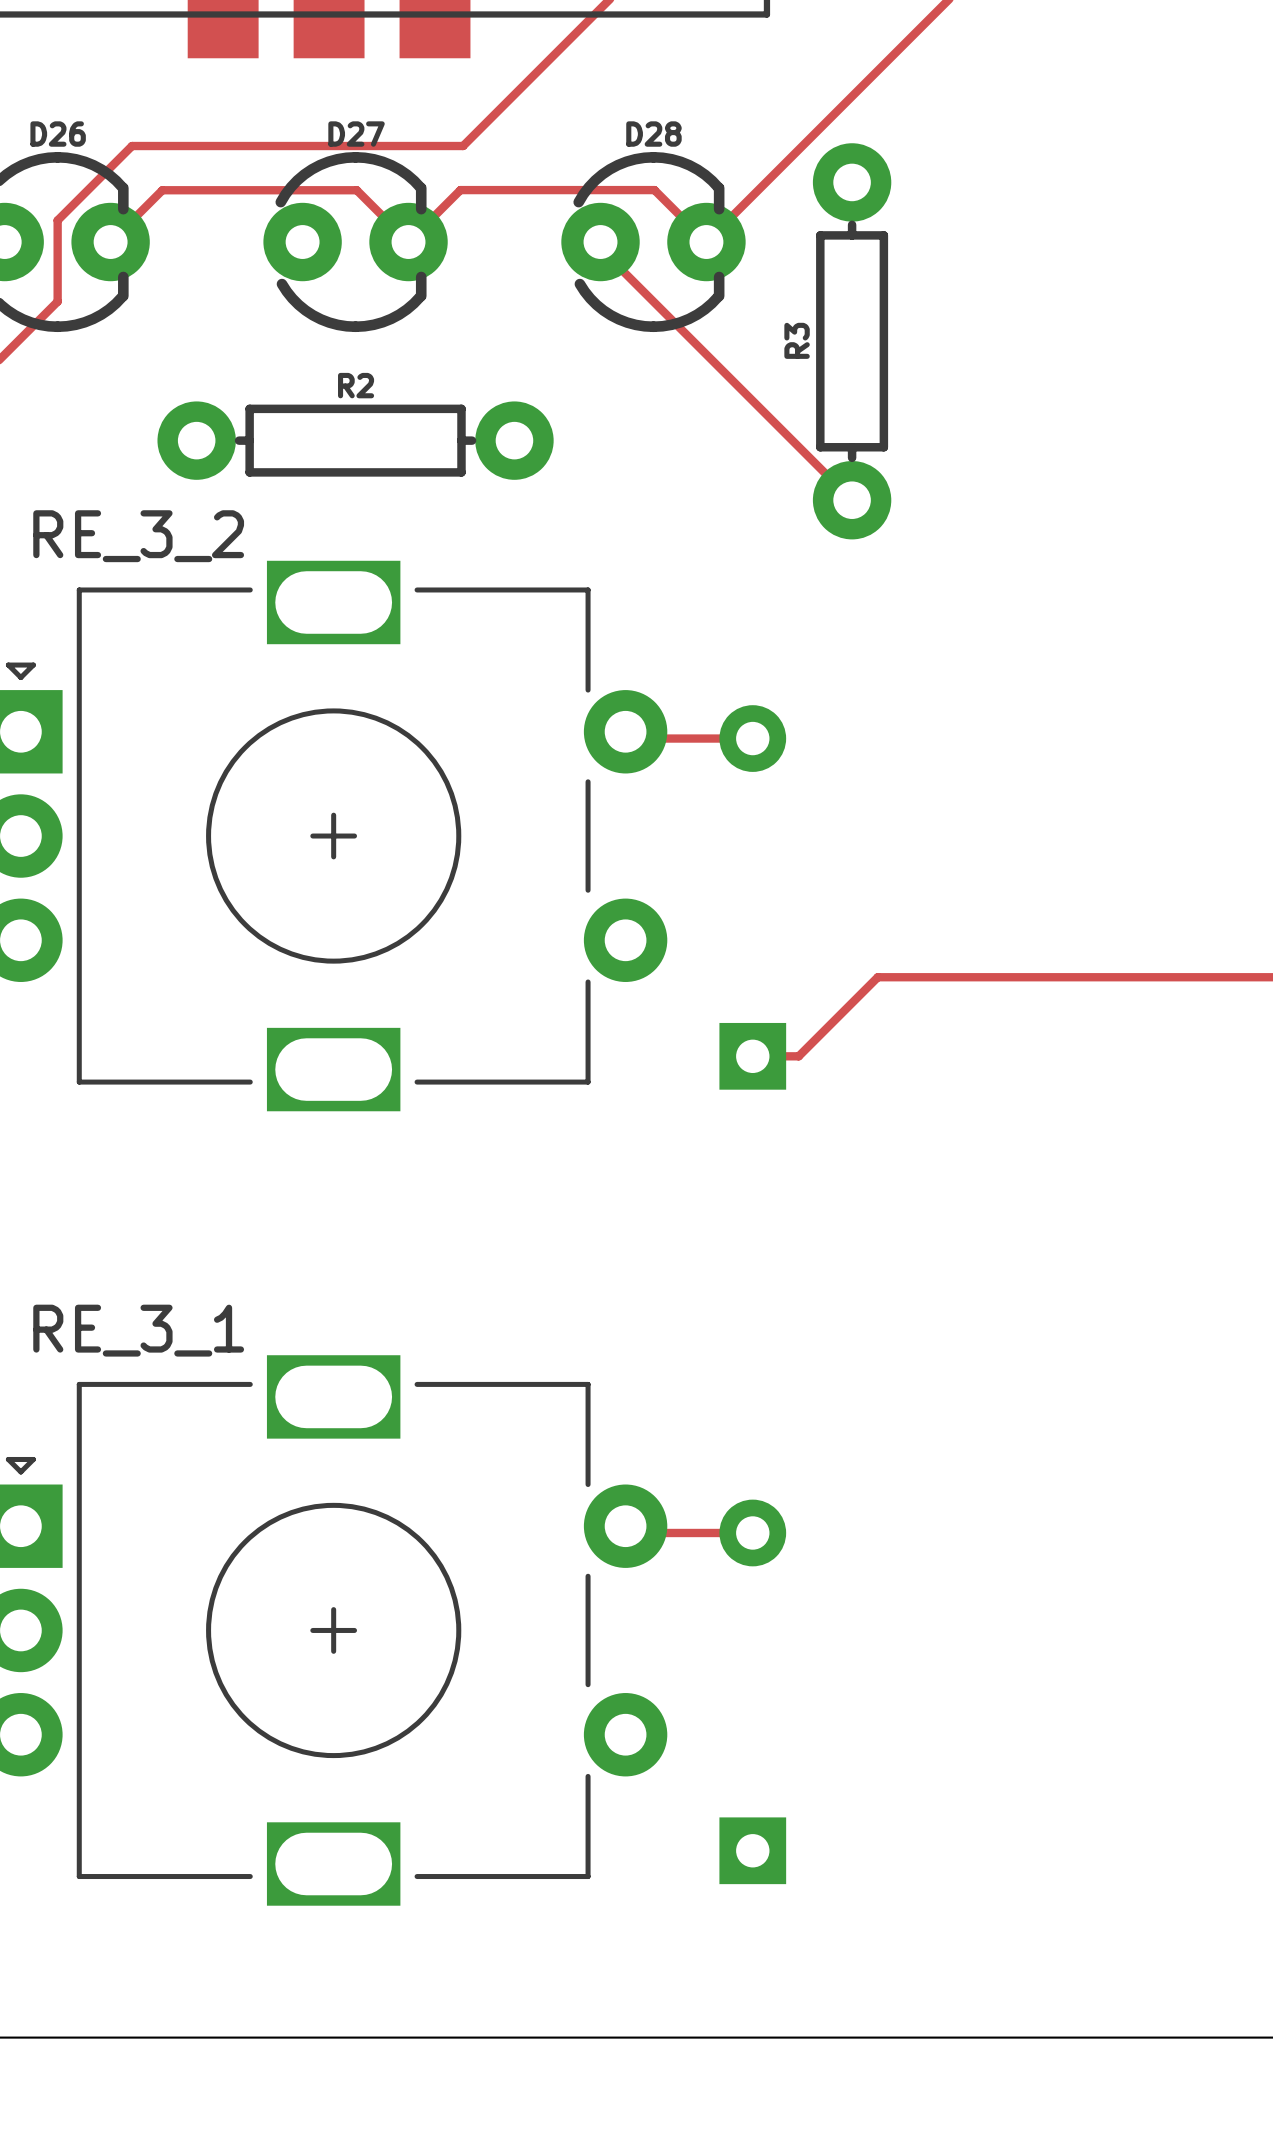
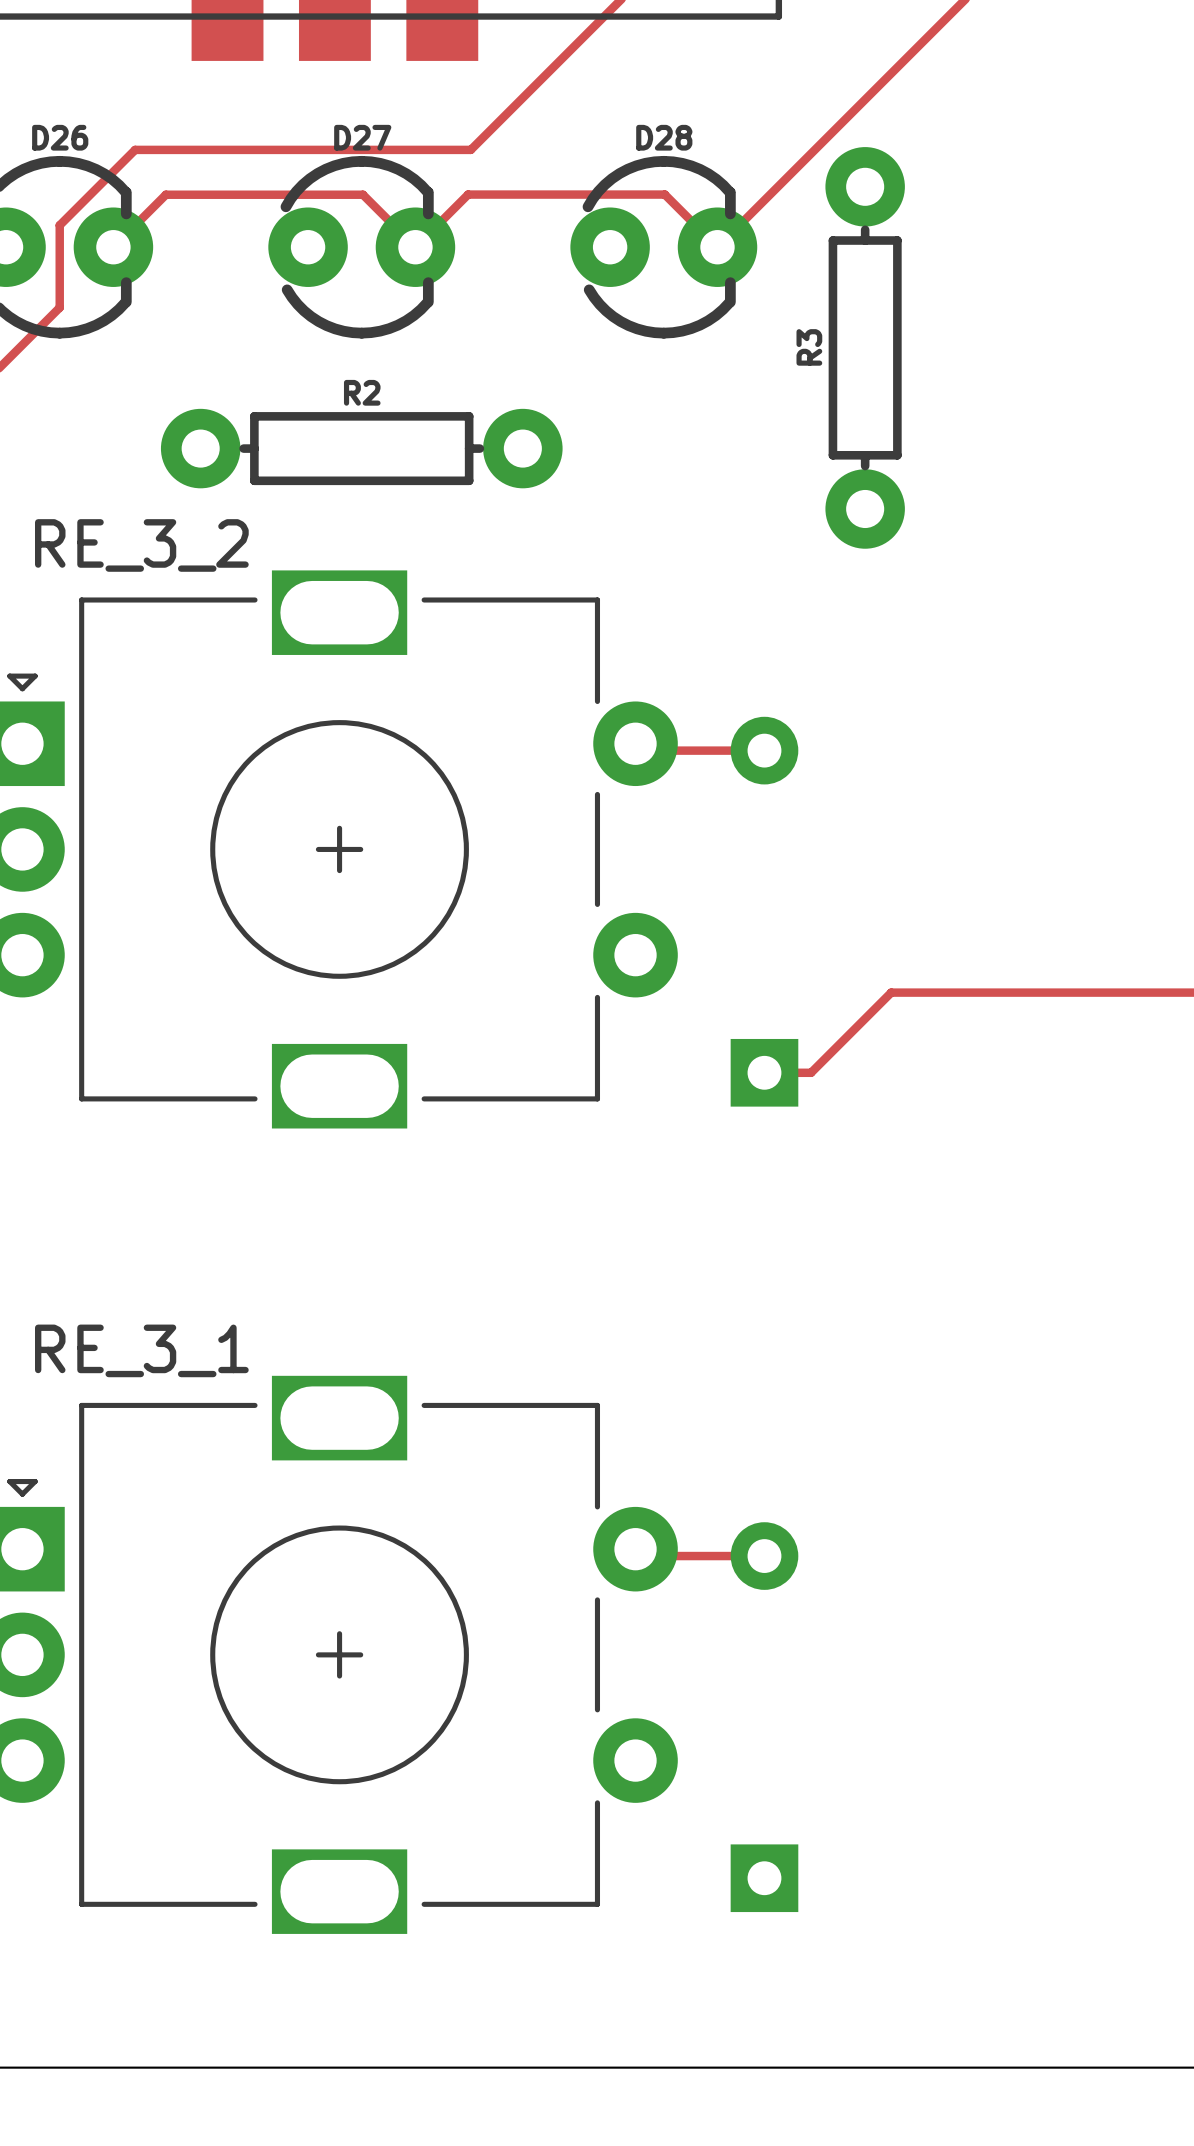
track: (600, 242) (600, 248) (852, 500) -> none

